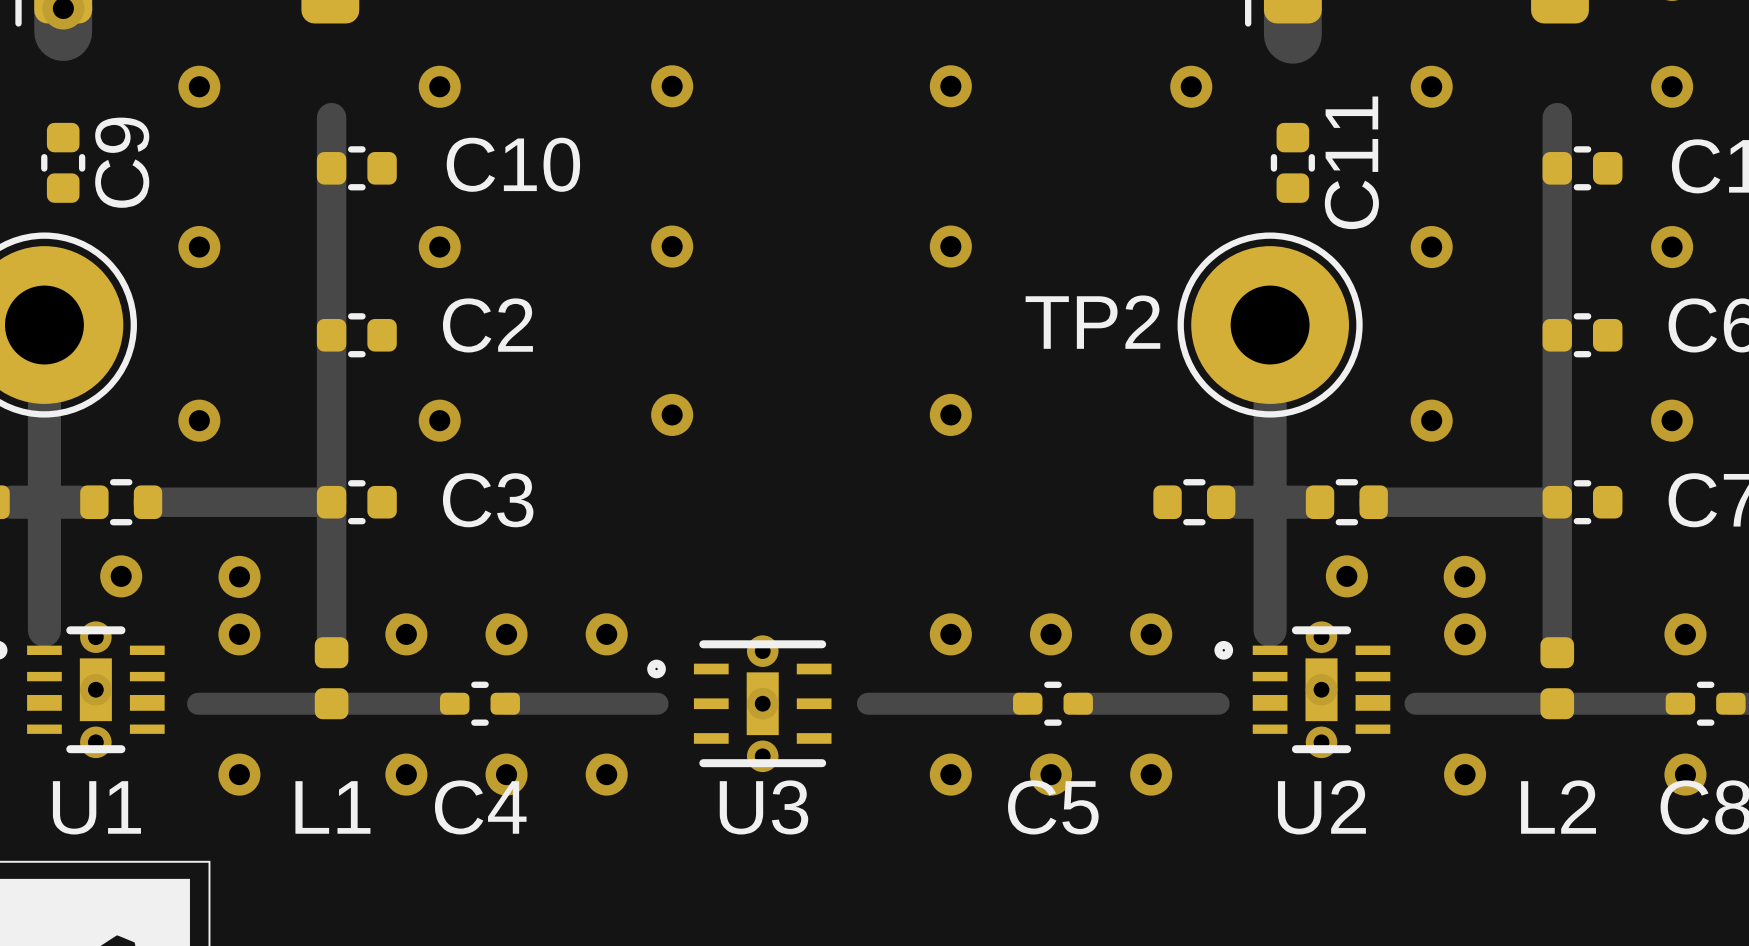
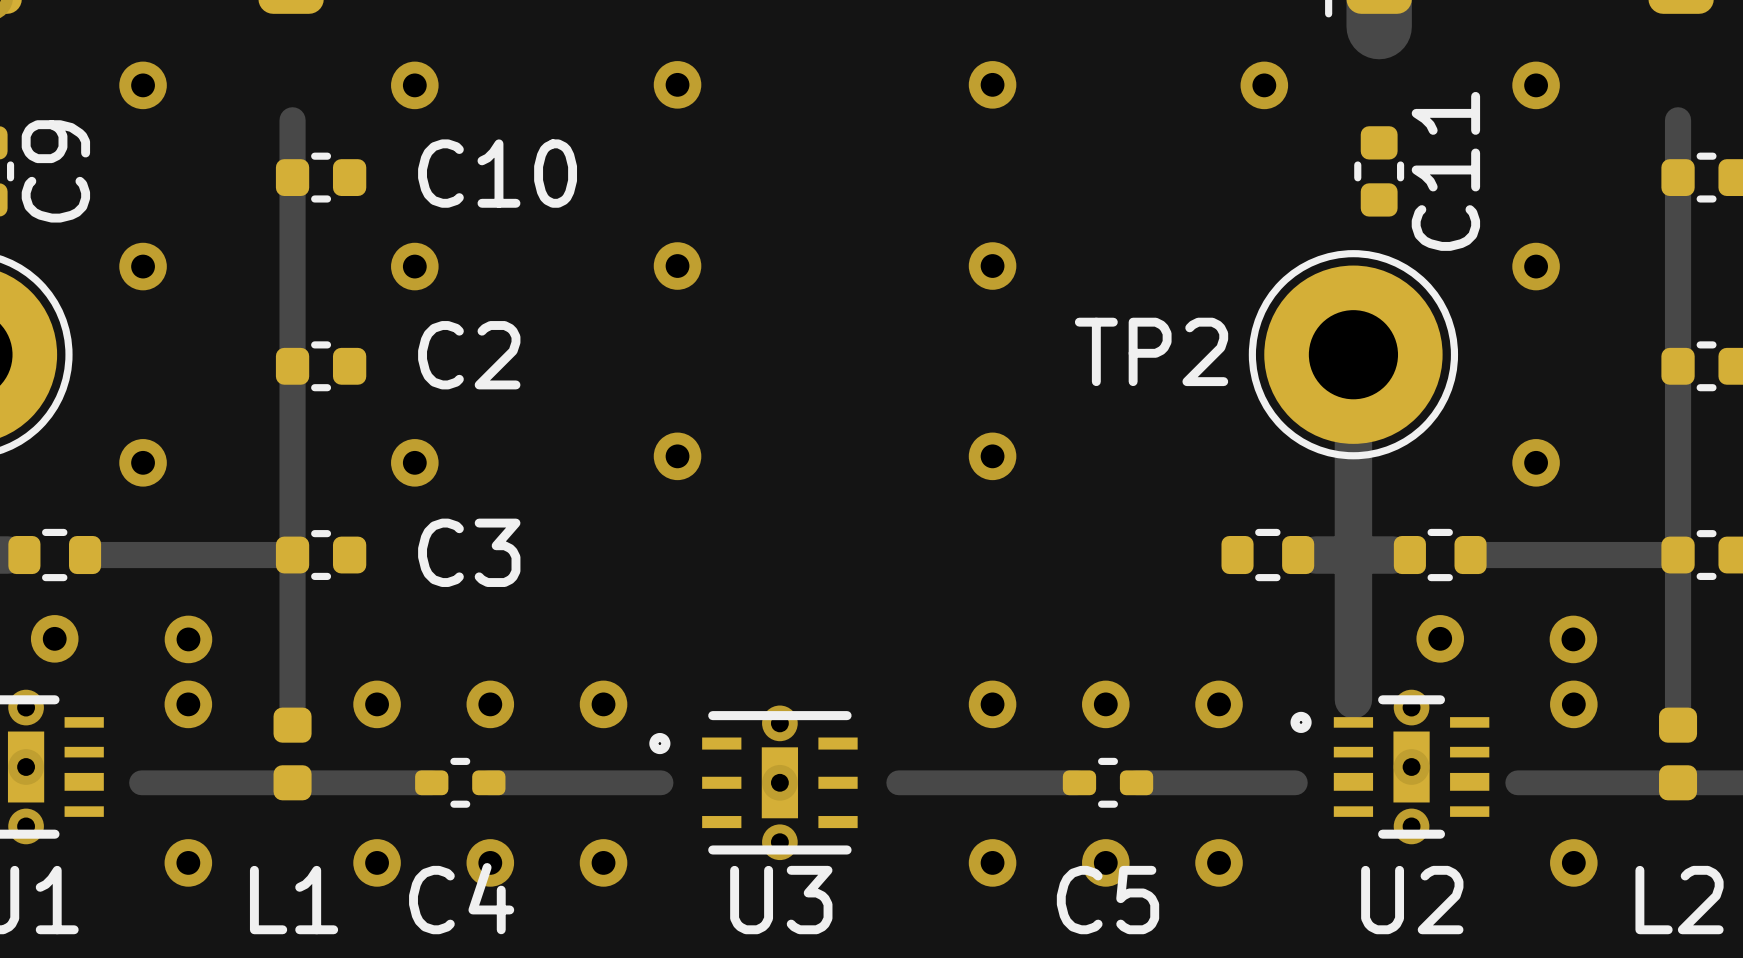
track width: thick (331, 117) (331, 652) -> thin (292, 120) (292, 725)
track width: thick (1557, 117) (1557, 652) -> thin (1678, 120) (1678, 725)
track width: thick (148, 502) (331, 502) -> thin (85, 555) (292, 555)
track width: thick (1373, 502) (1557, 502) -> thin (1470, 555) (1678, 555)

